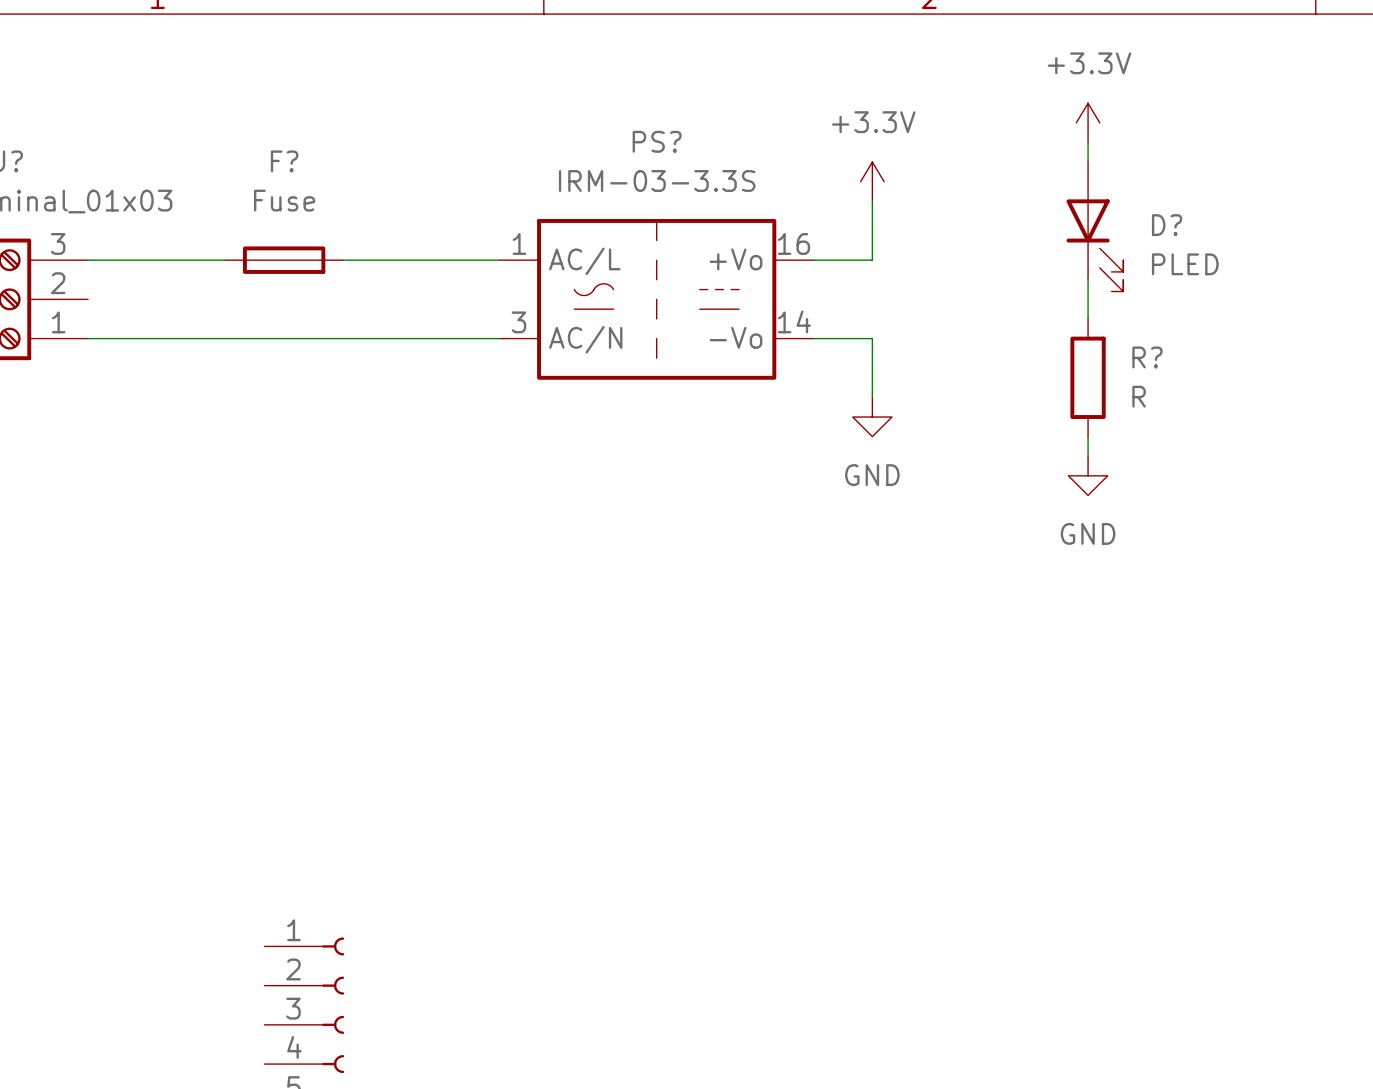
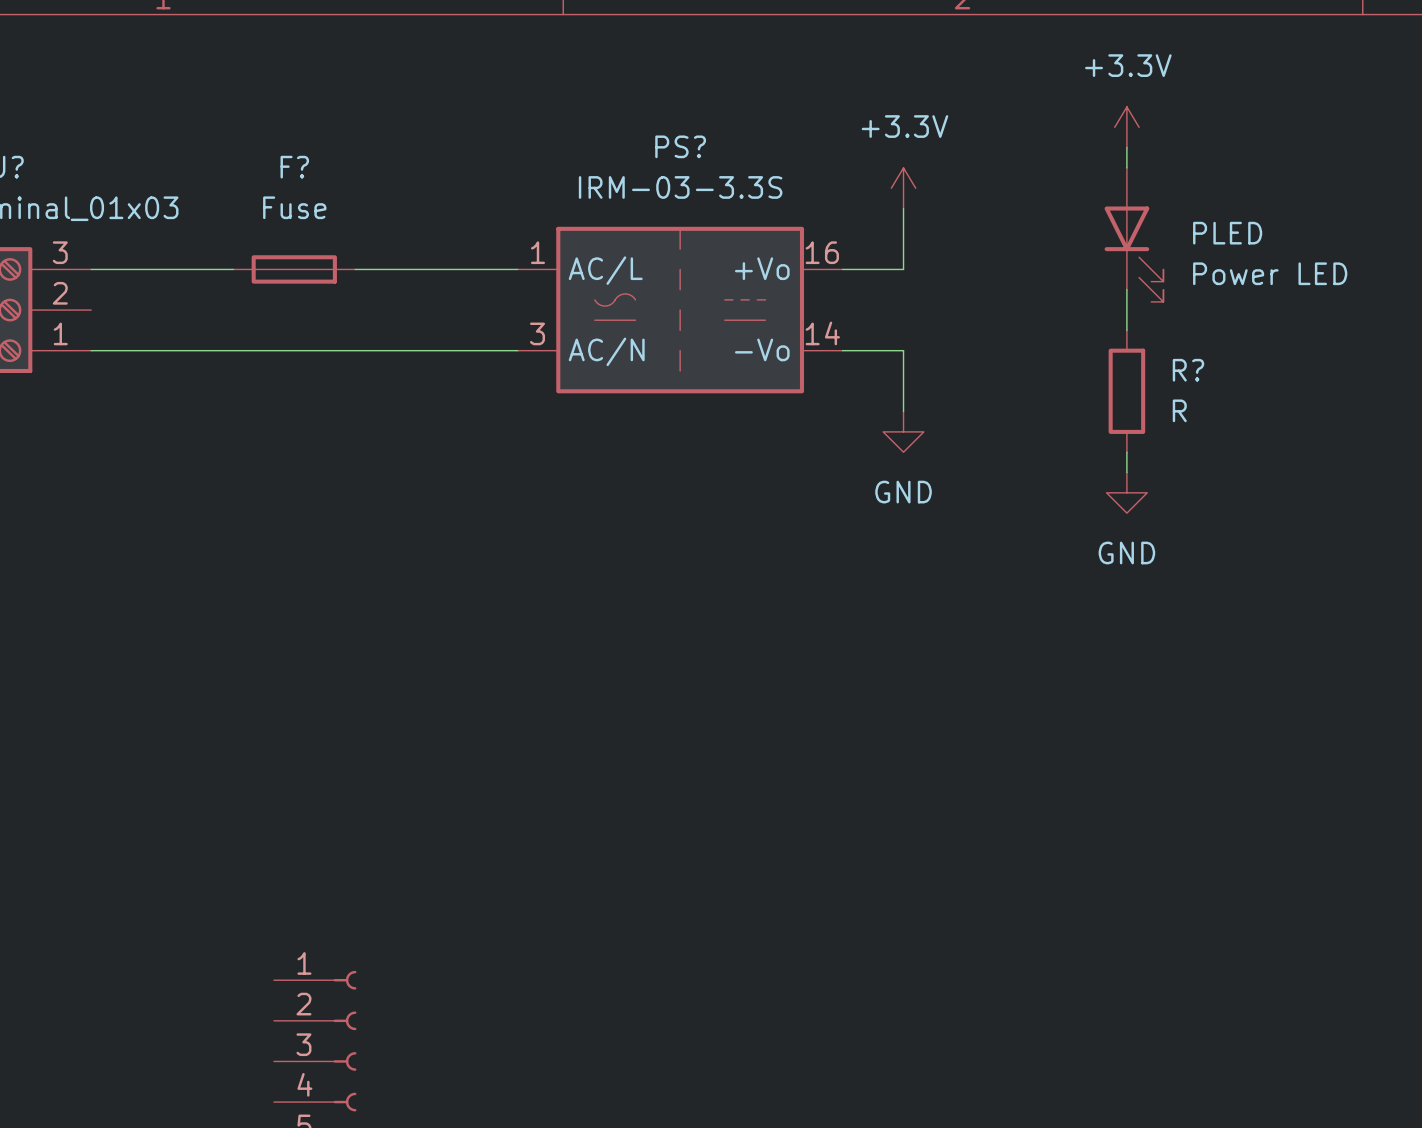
D? name: D? (1167, 225) -> PLED (1227, 233)
D? value: PLED (1185, 264) -> Power LED (1270, 273)

